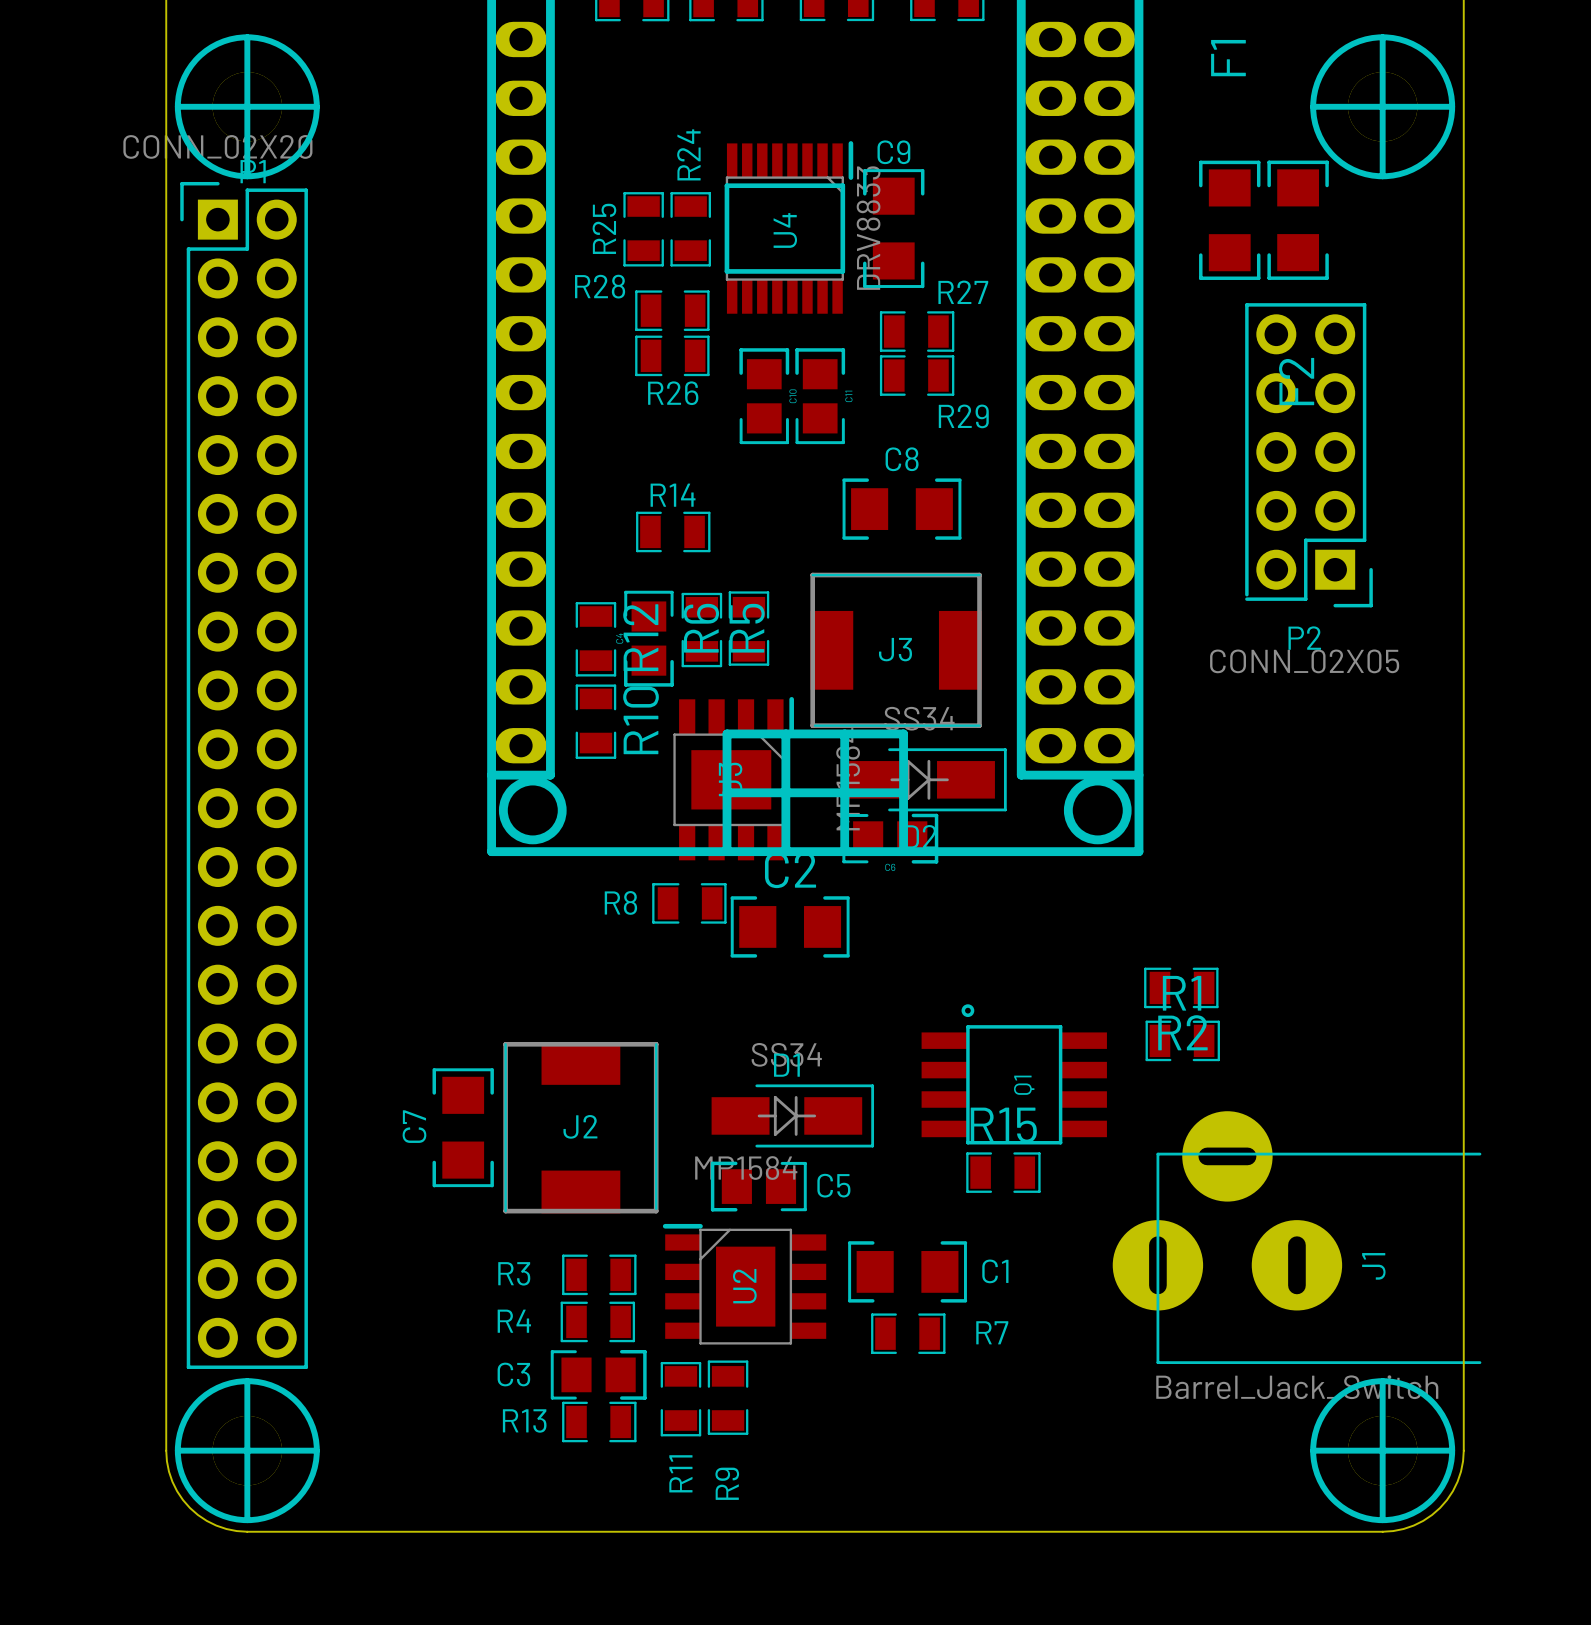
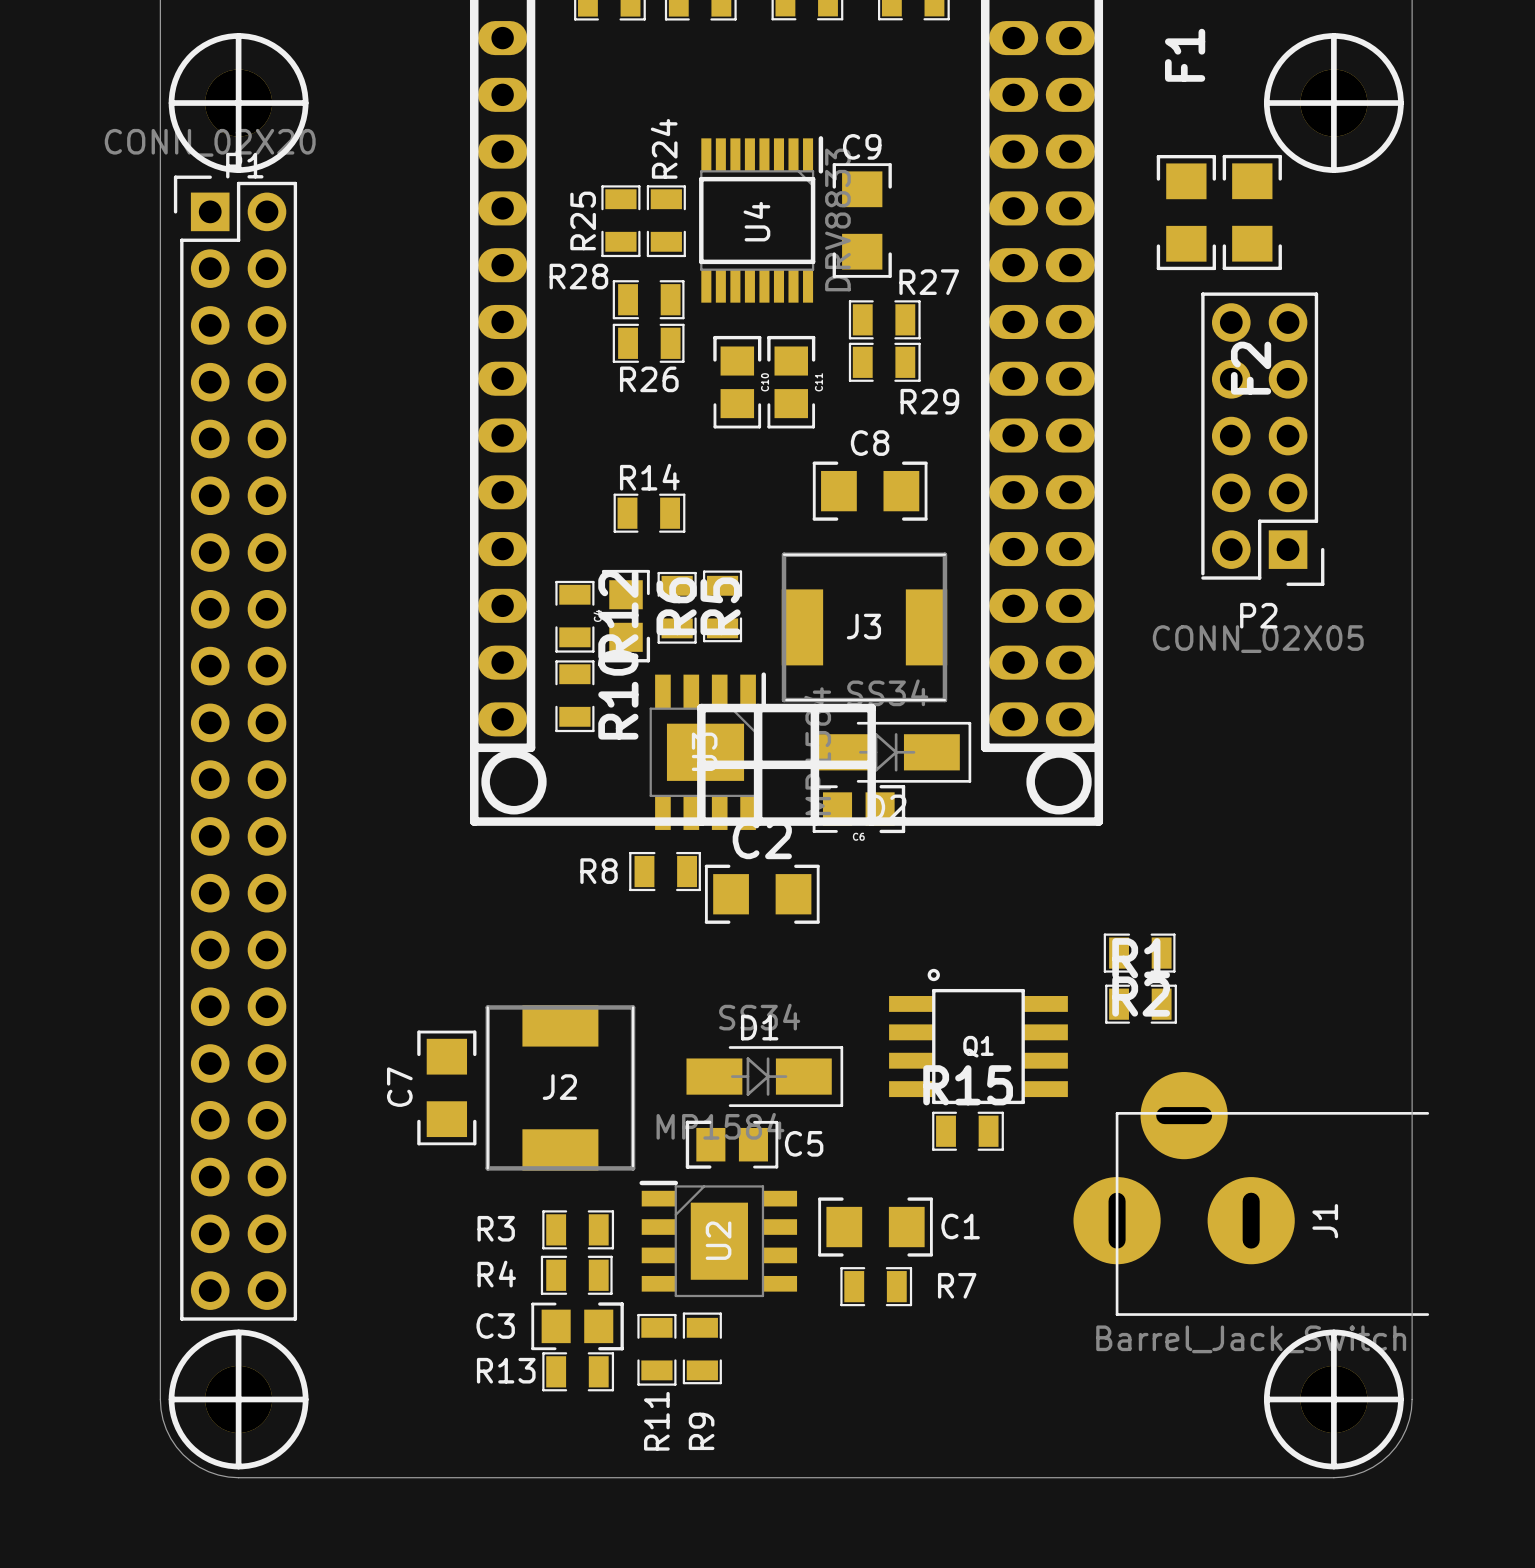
Q1 name rotation: 0° (1024, 1085) -> 90° clockwise (978, 1046)

